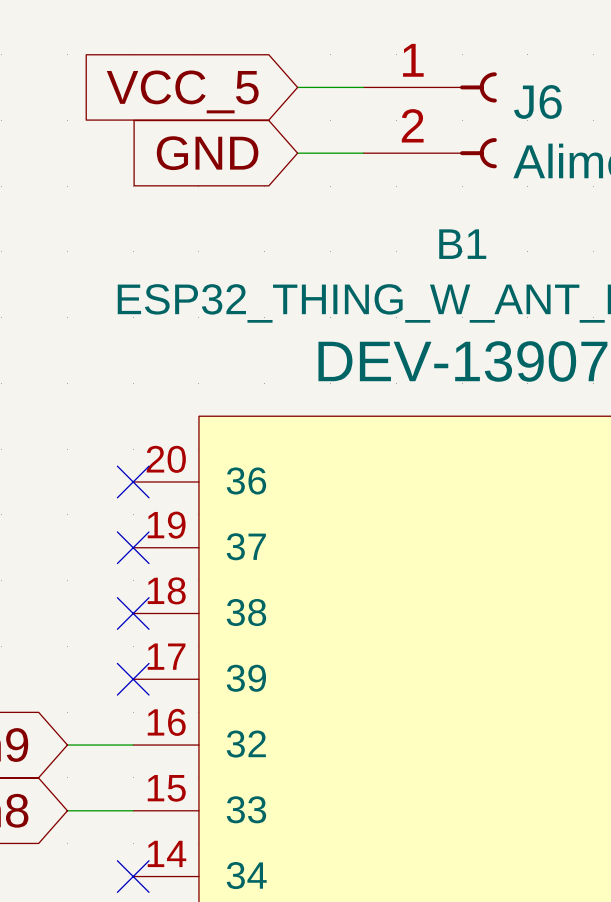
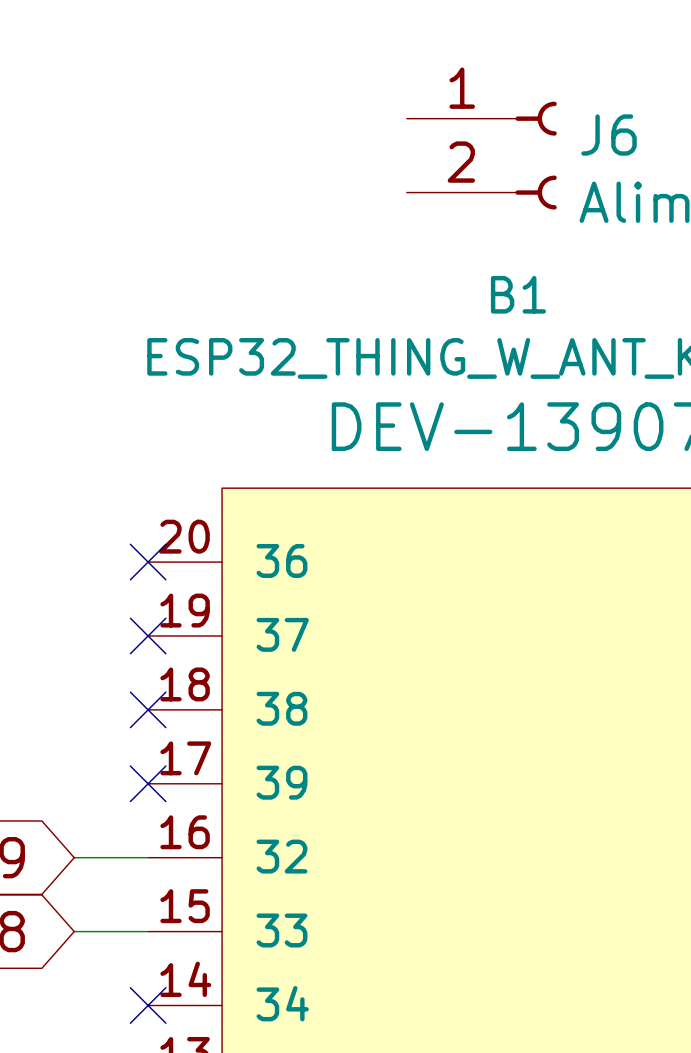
wire: (297, 87) (363, 87) -> none
global label: VCC_5 (182, 91) -> none
global label: GND (207, 153) -> none
wire: (297, 153) (363, 153) -> none

